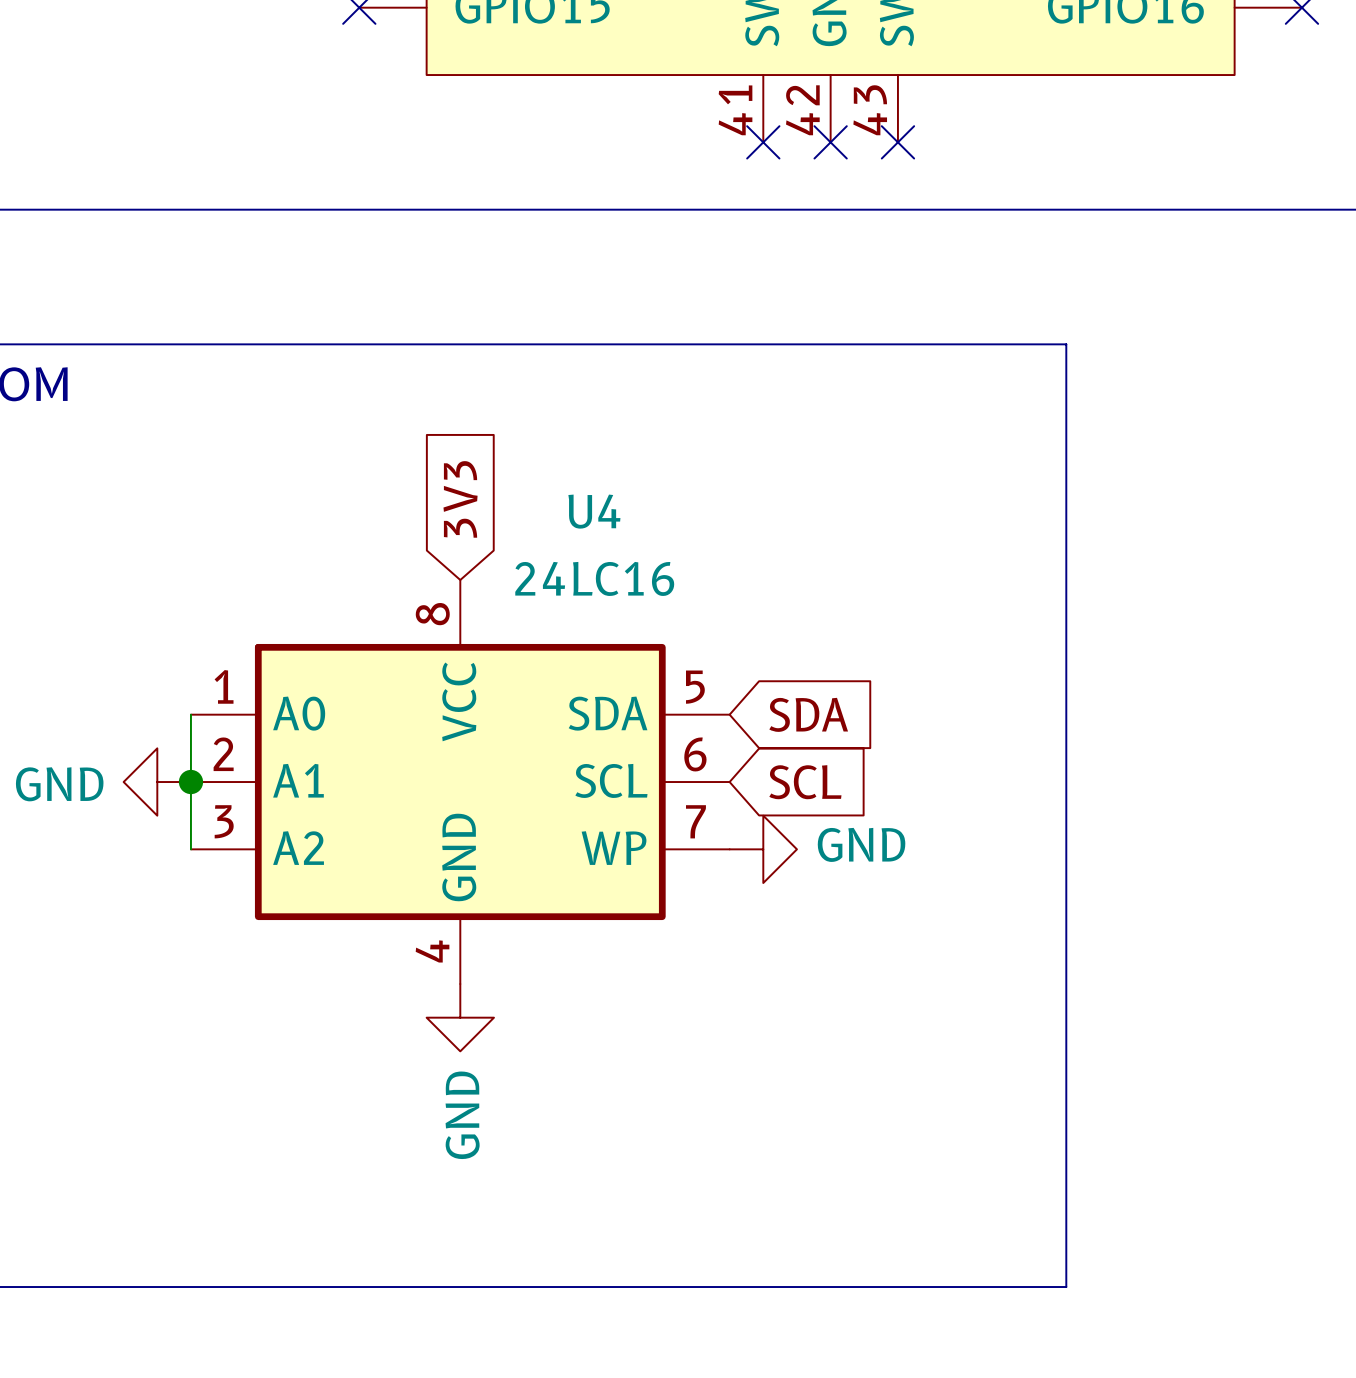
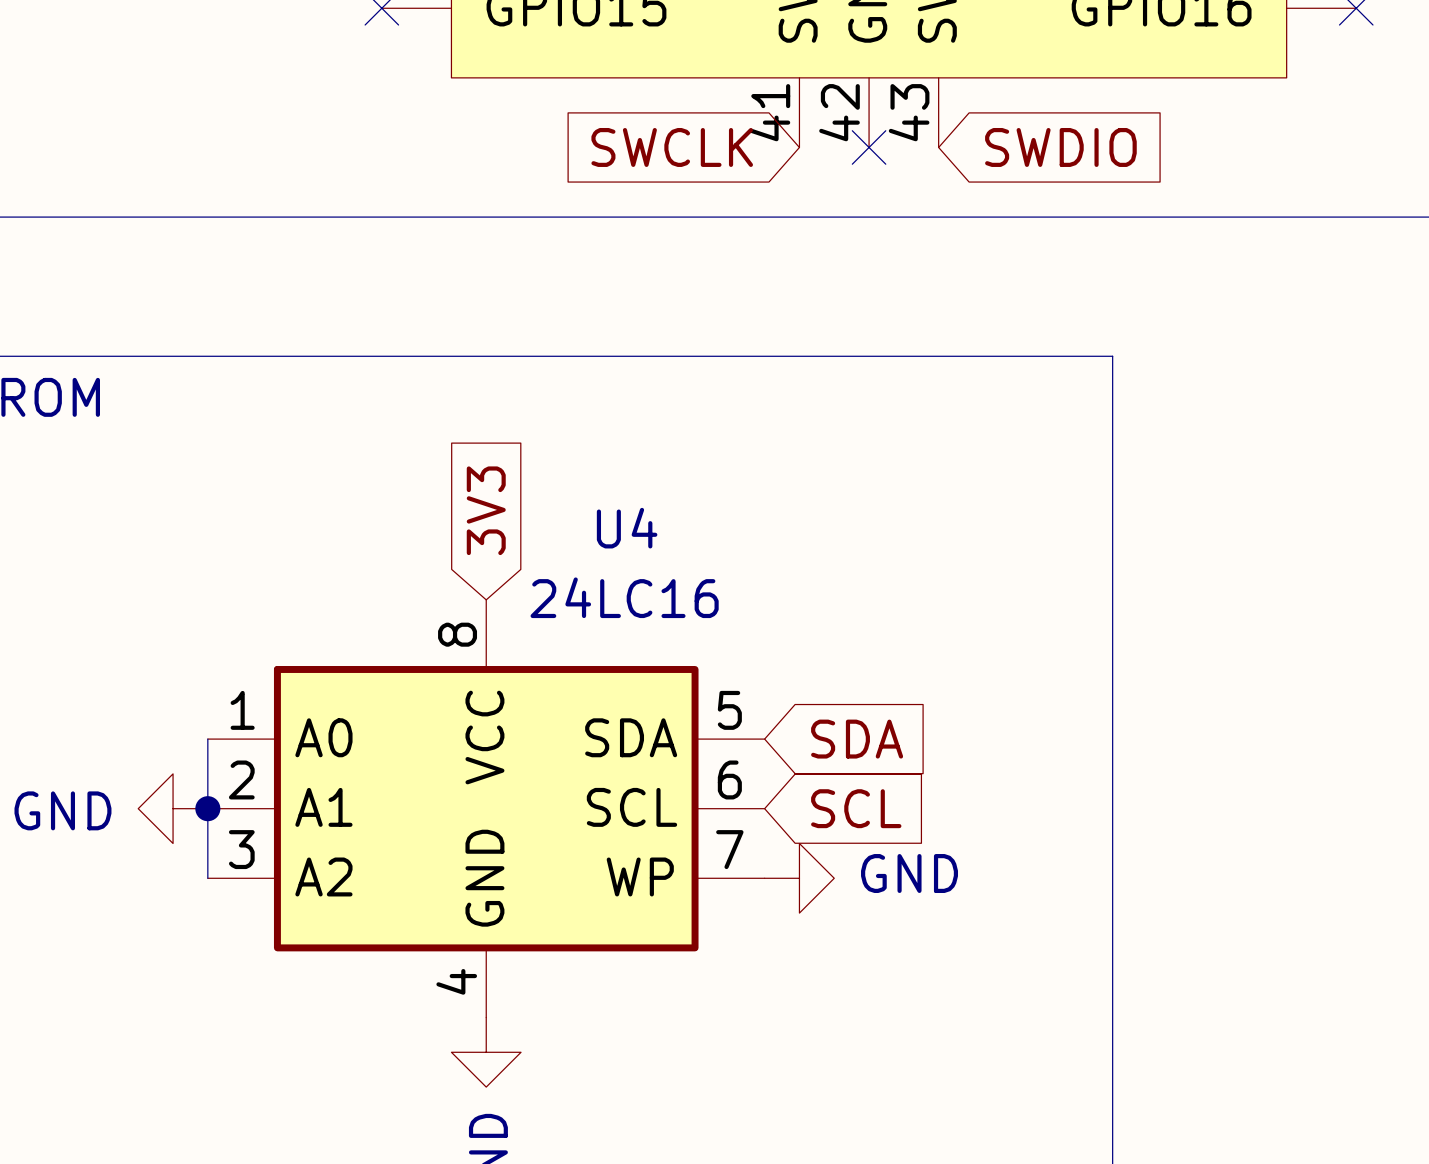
global label: none -> SWCLK (672, 147)
no-connect mark: (763, 142) -> none
no-connect mark: (897, 142) -> none
global label: none -> SWDIO (1060, 147)

